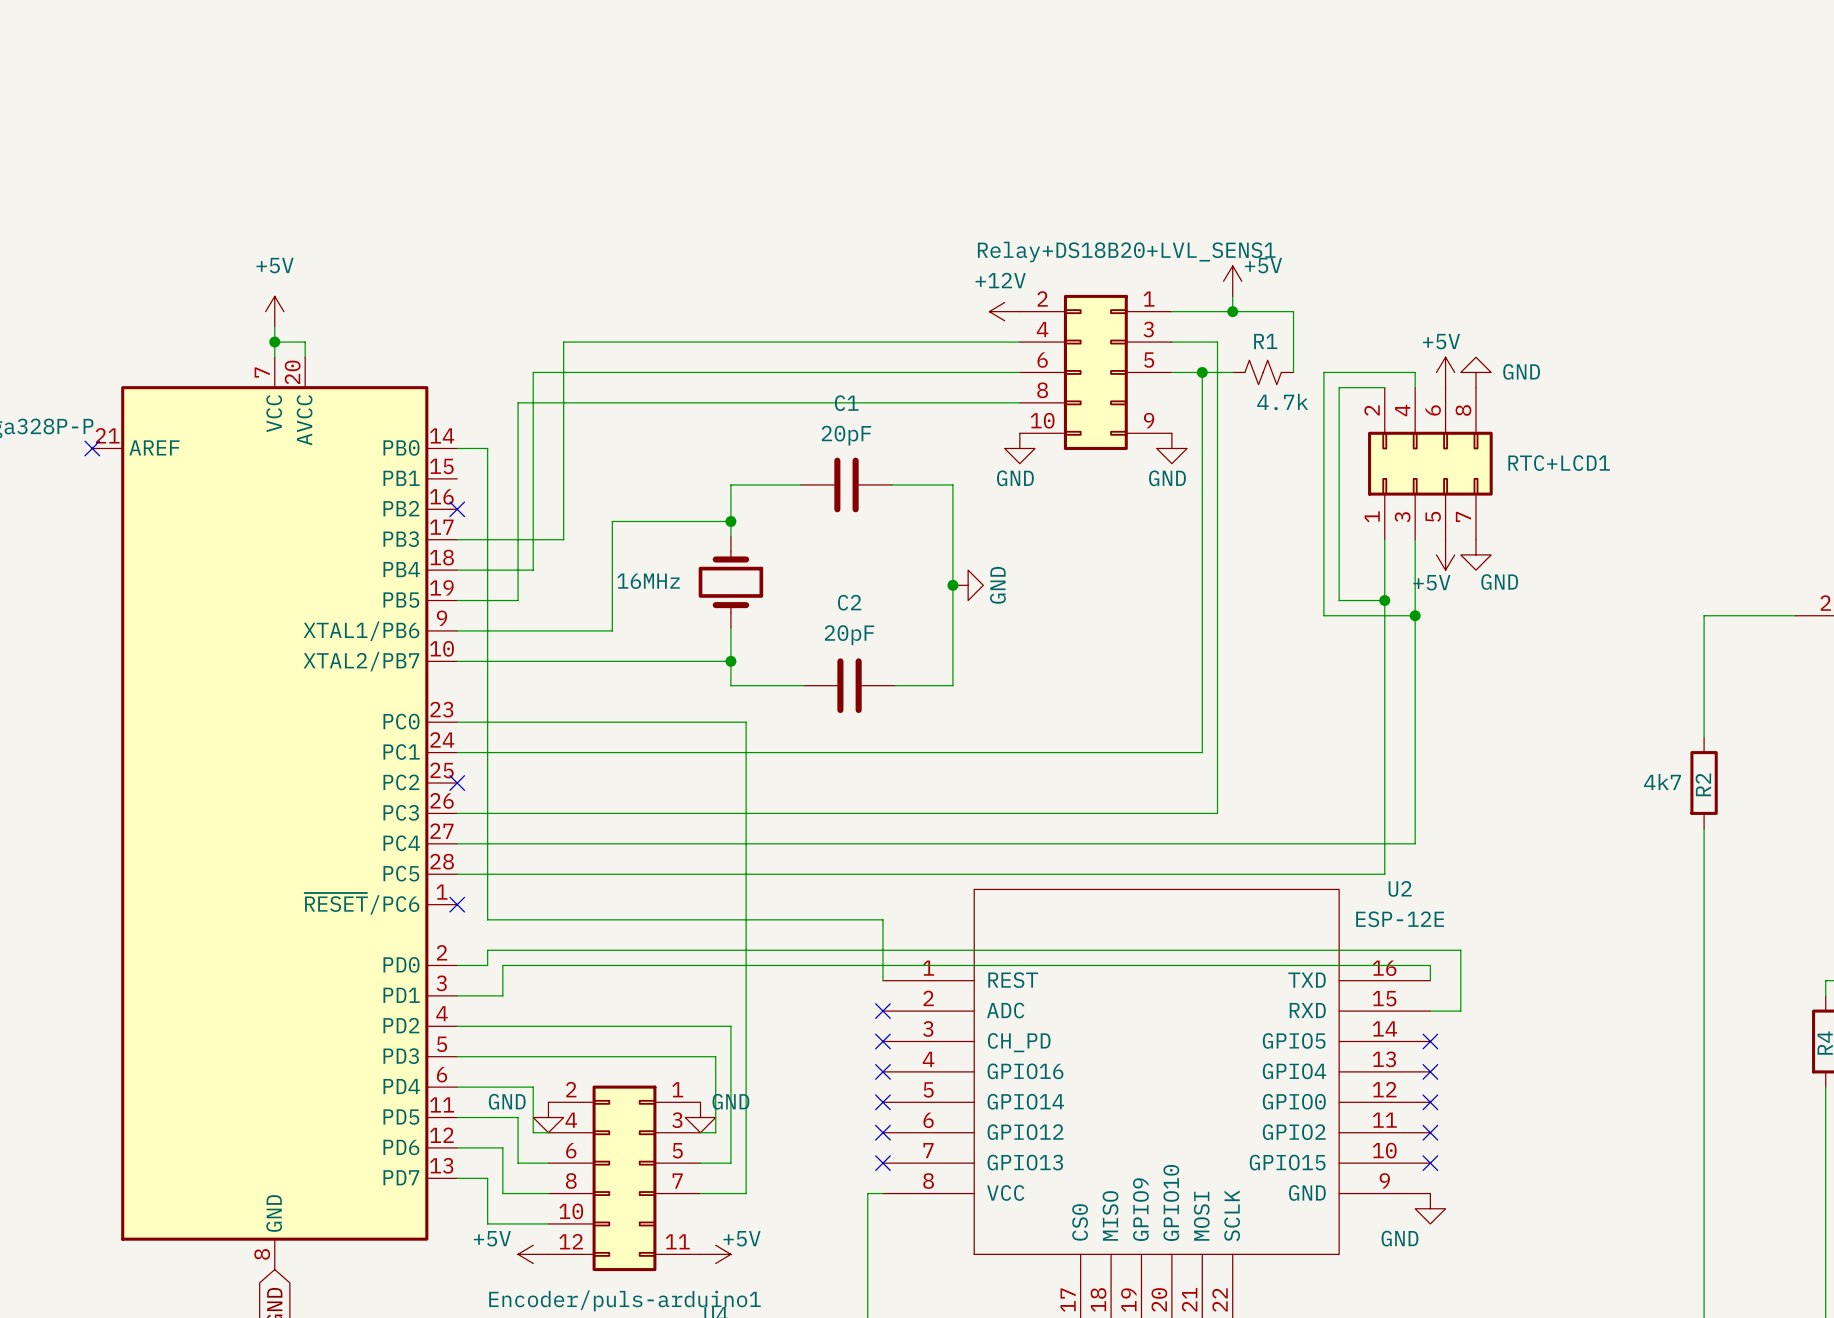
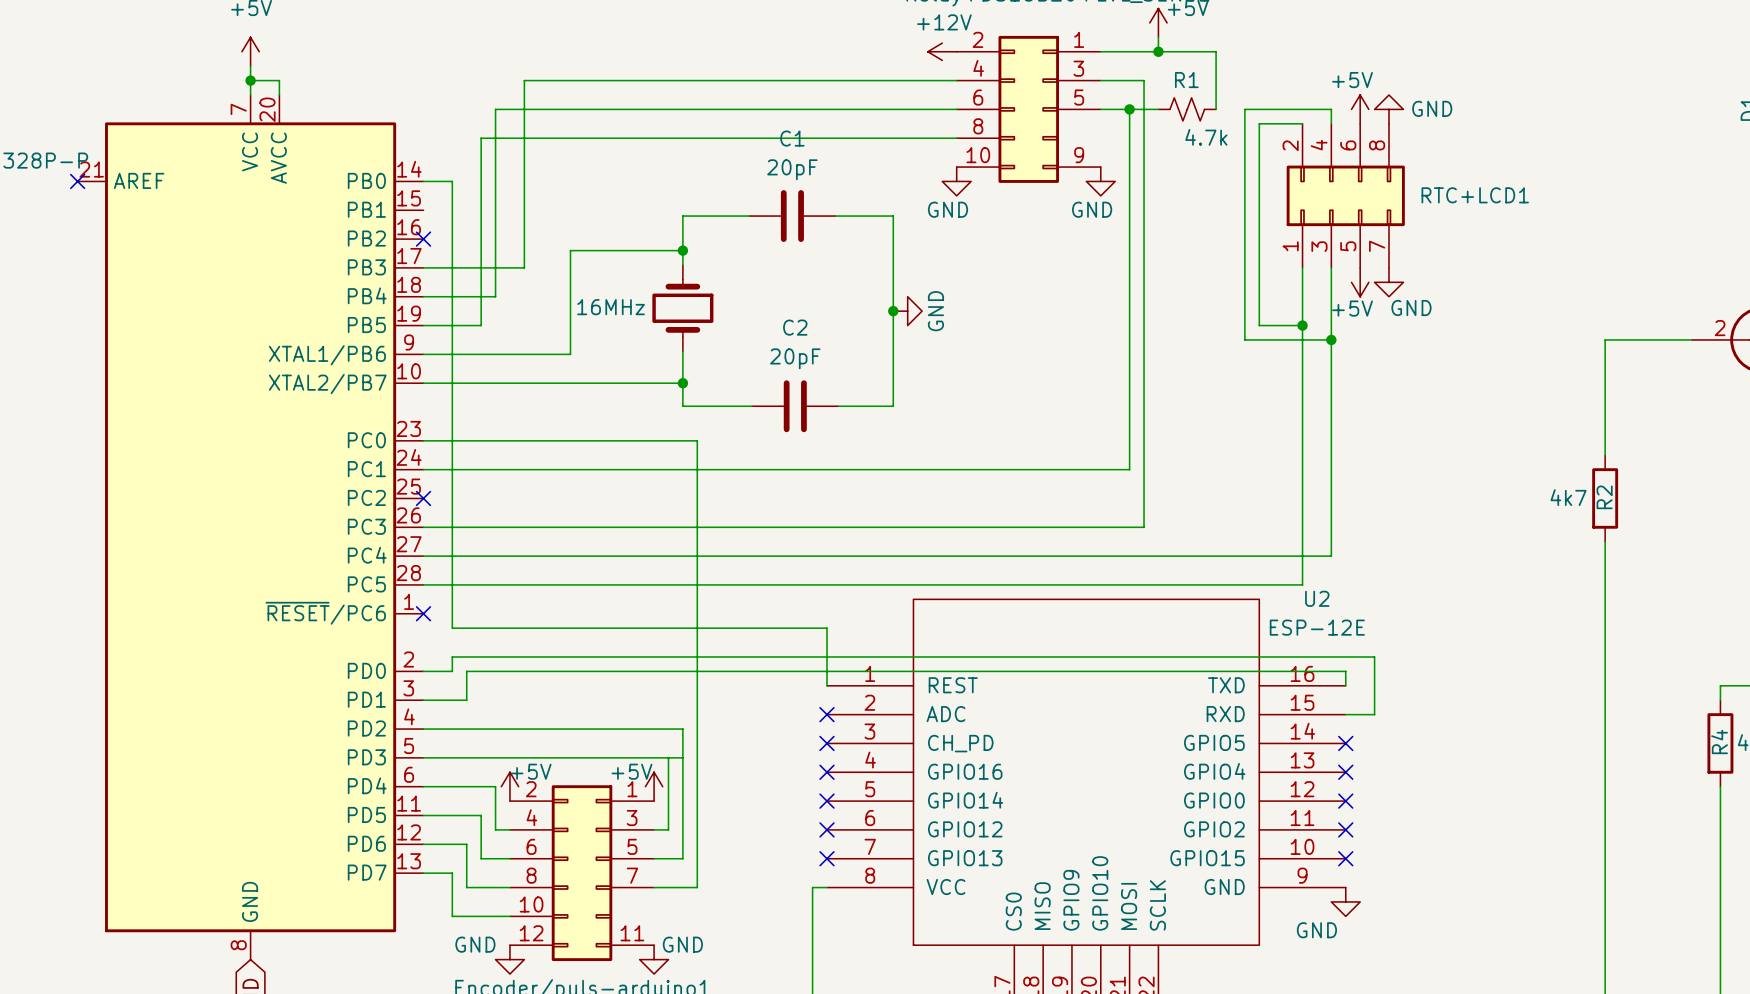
wire: none -> (668, 757) (682, 757)
power symbol: none -> +5V (509, 786)
power symbol: none -> +5V (654, 786)
power symbol: GND (548, 1117) -> none
power symbol: GND (700, 1117) -> none
power symbol: +5V (533, 1254) -> none
power symbol: +5V (715, 1254) -> none
power symbol: none -> GND (509, 959)
power symbol: none -> GND (654, 959)

